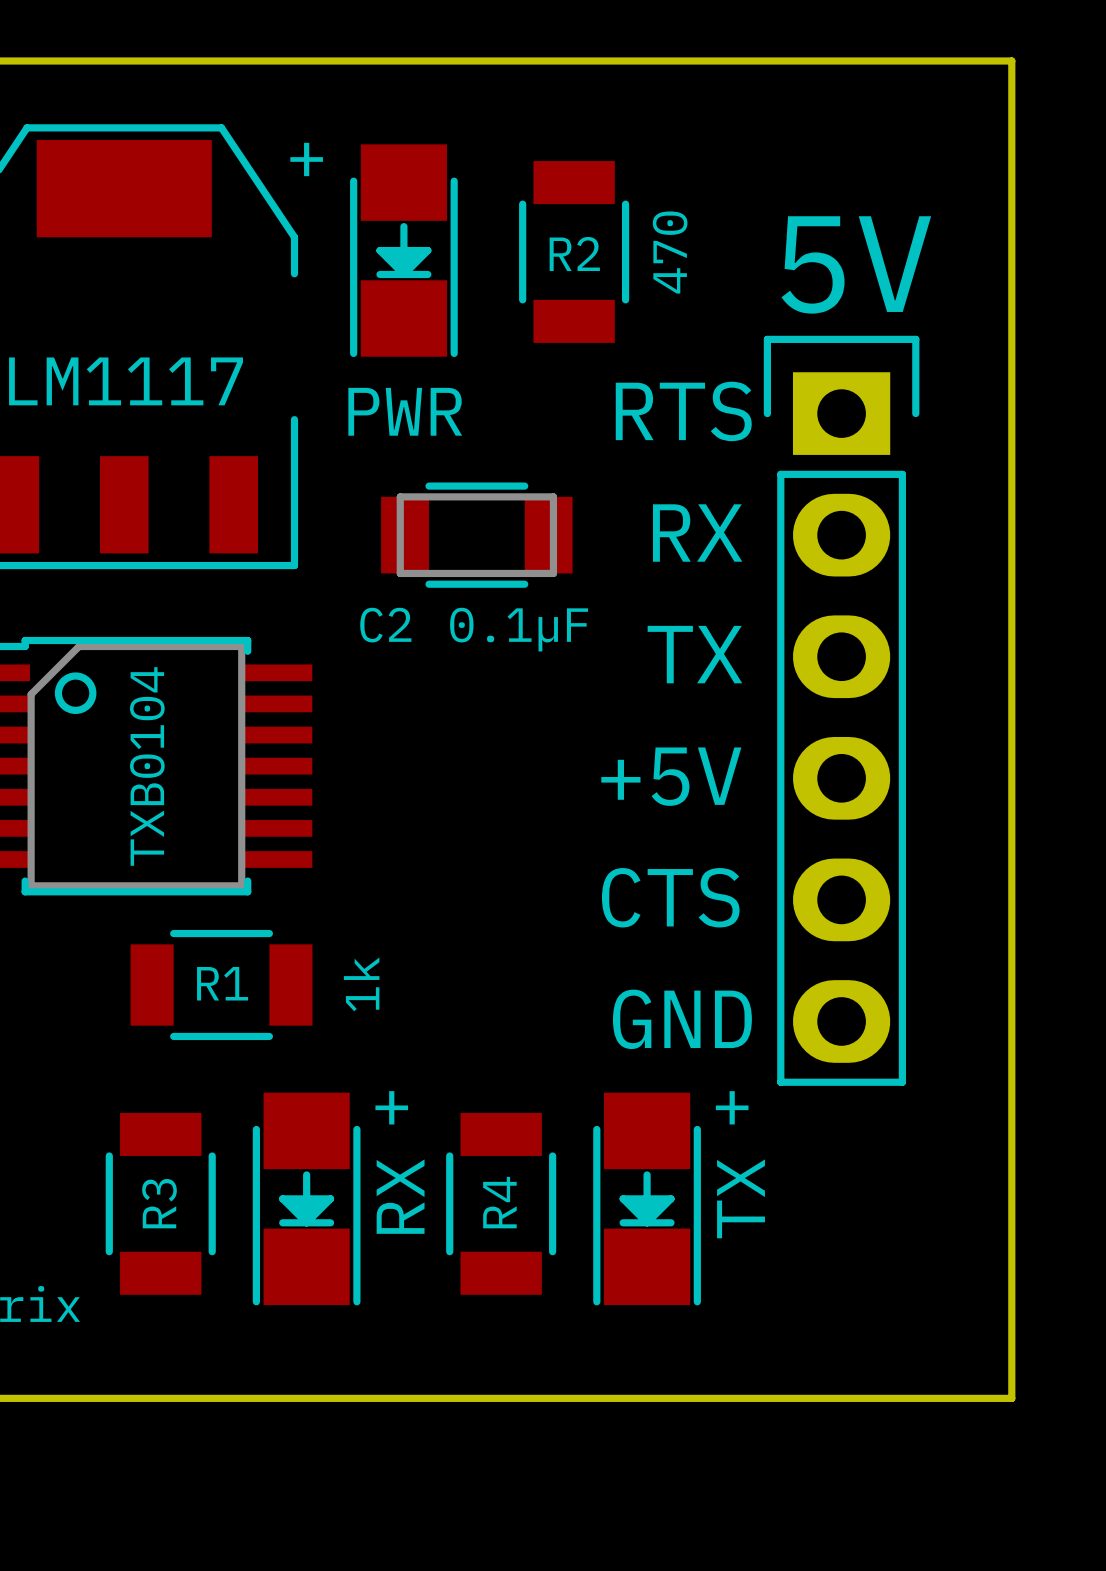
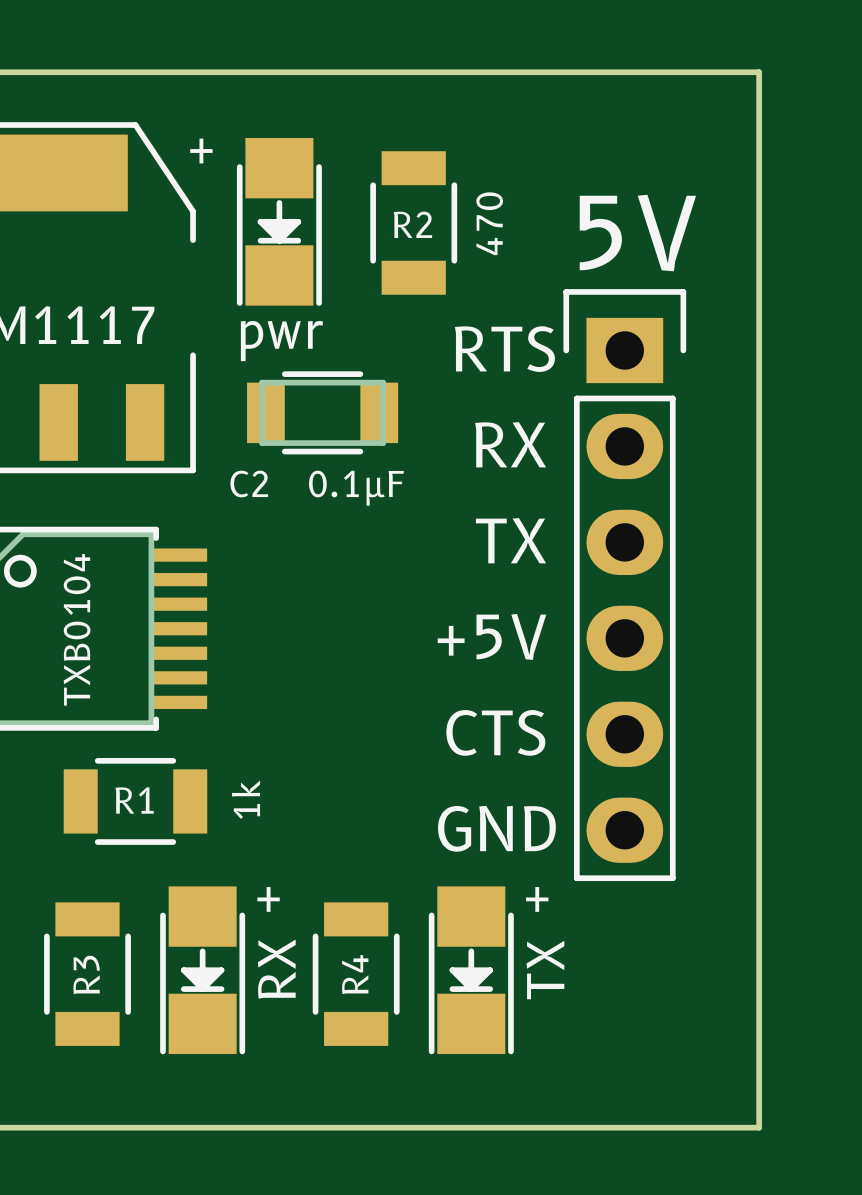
part value: PWR (405, 411) -> pwr (281, 341)
C2 position: (476, 535) -> (322, 412)

